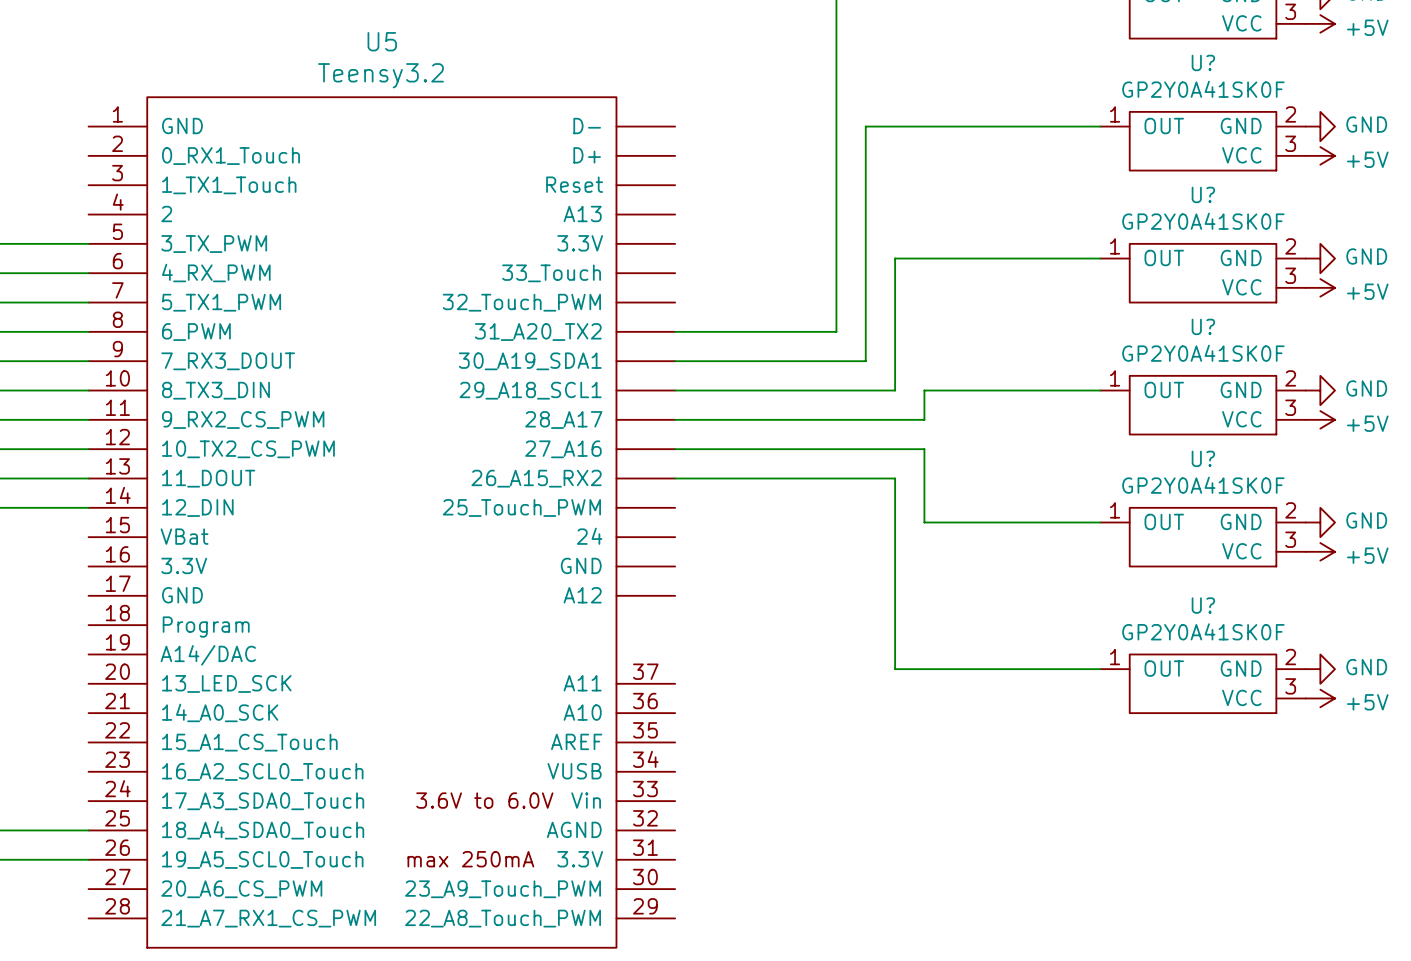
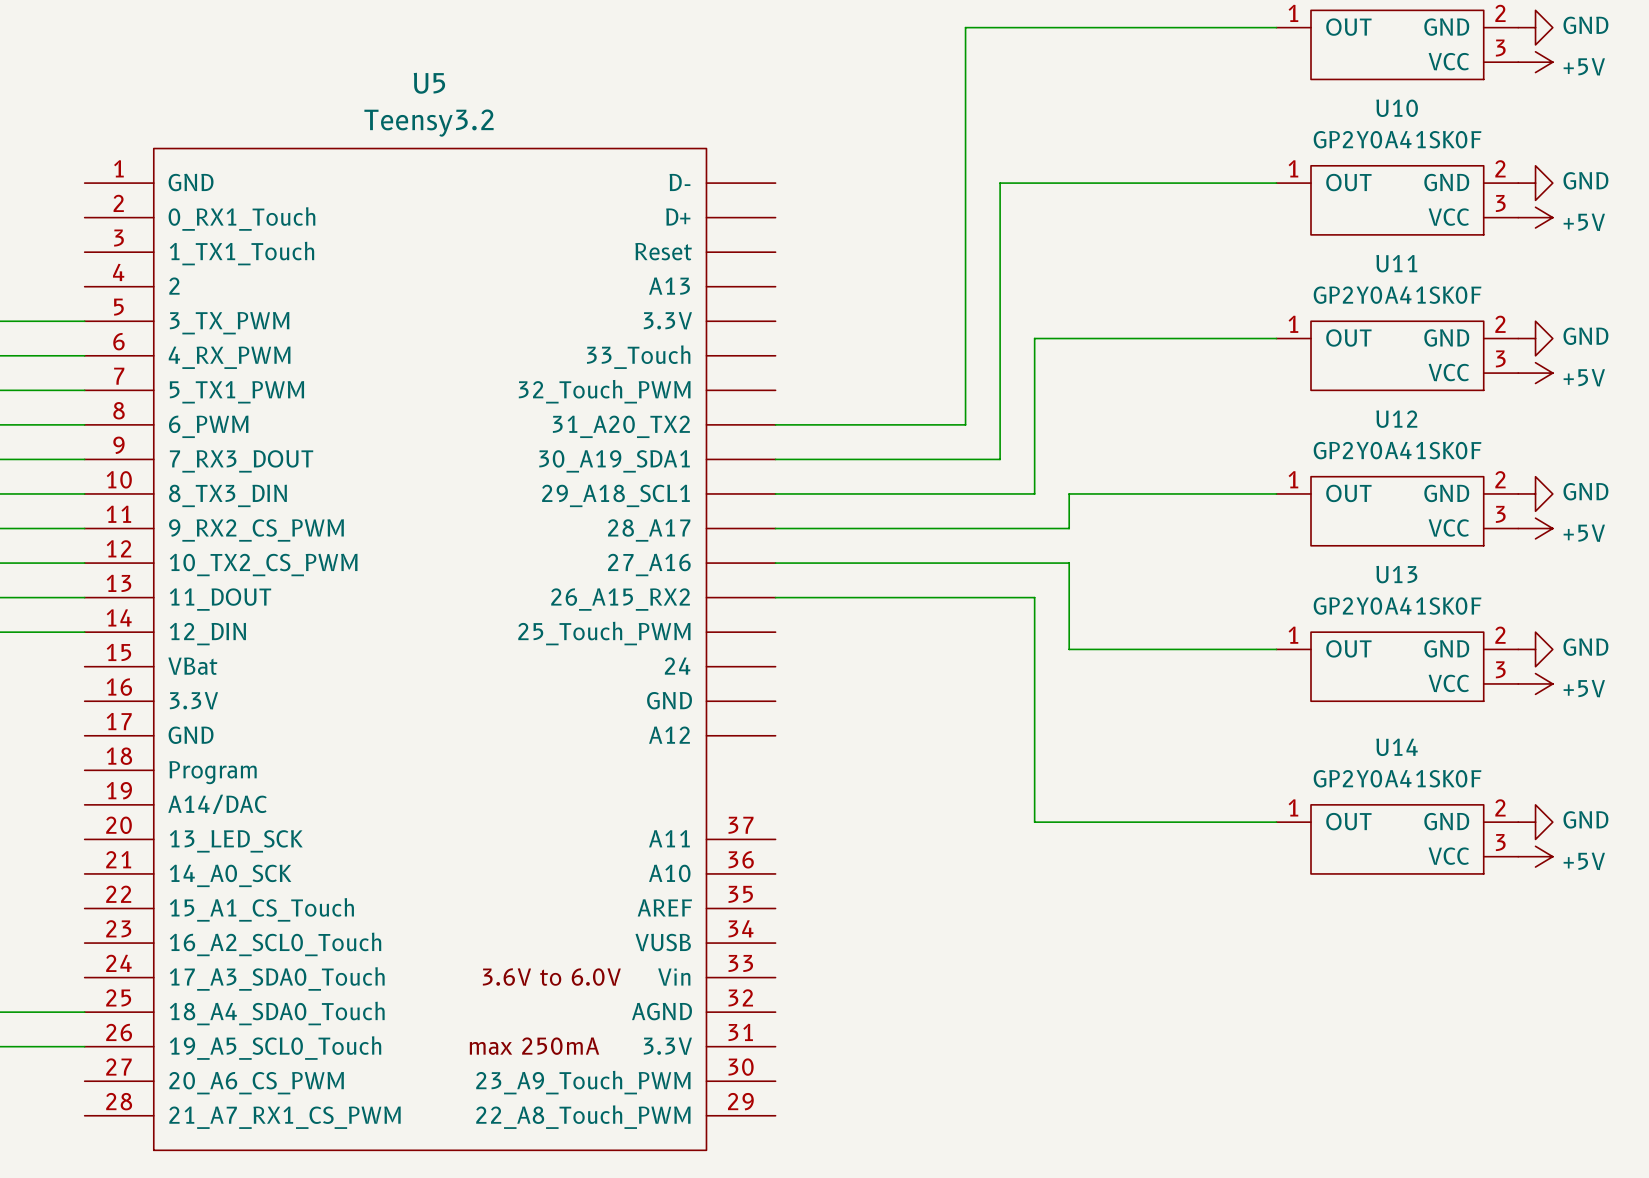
U? name: U? (1203, 62) -> U10 (1397, 108)
U? name: U? (1203, 194) -> U11 (1396, 263)
U? name: U? (1203, 326) -> U12 (1396, 419)
U? name: U? (1203, 458) -> U13 (1396, 574)
U? name: U? (1203, 605) -> U14 (1397, 747)

